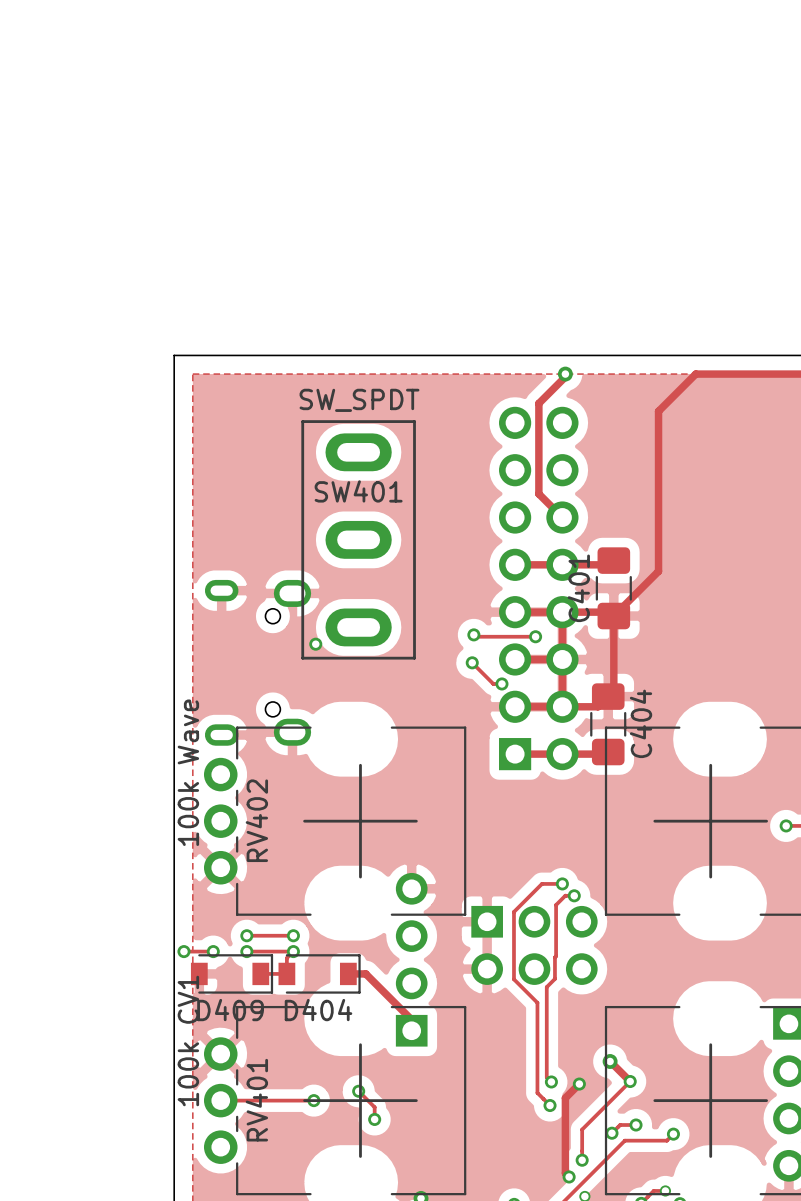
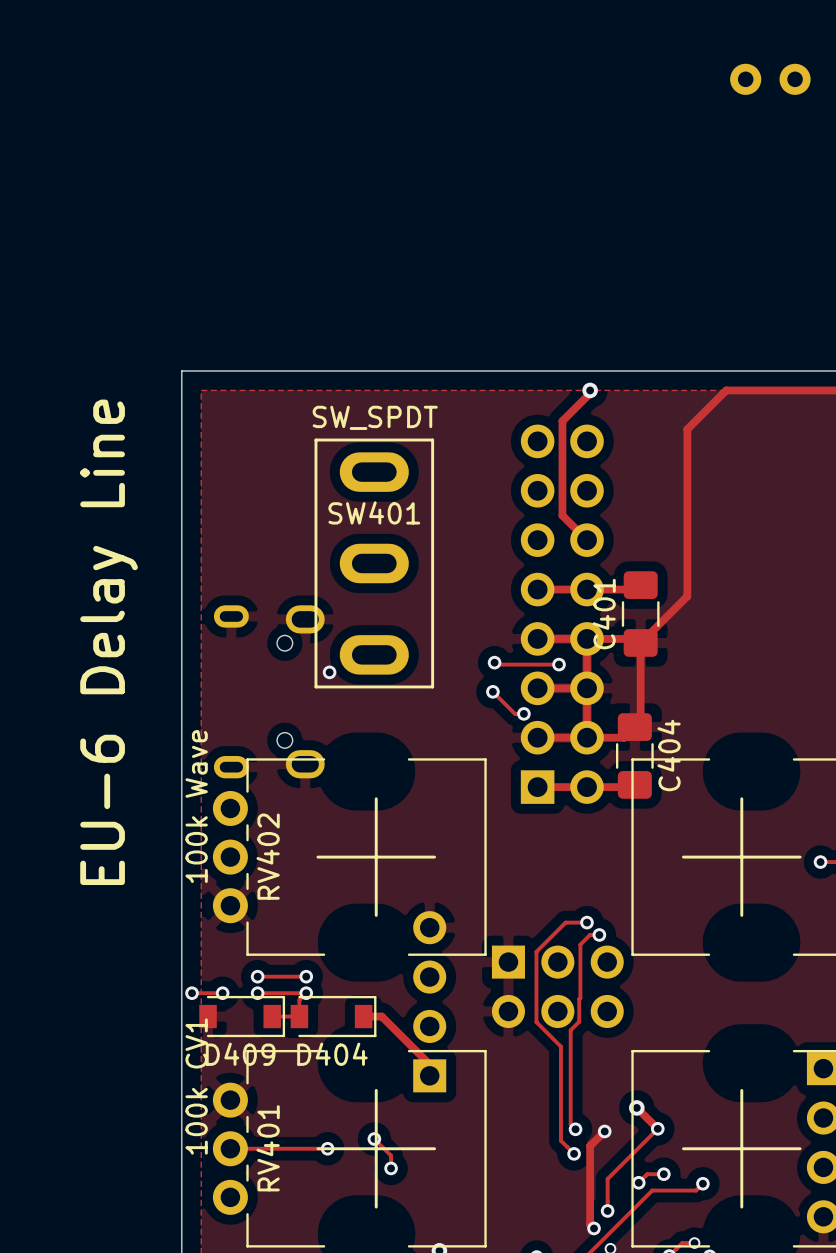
part: none -> (770, 79)
text: none -> EU-6 Delay Line (109, 642)

